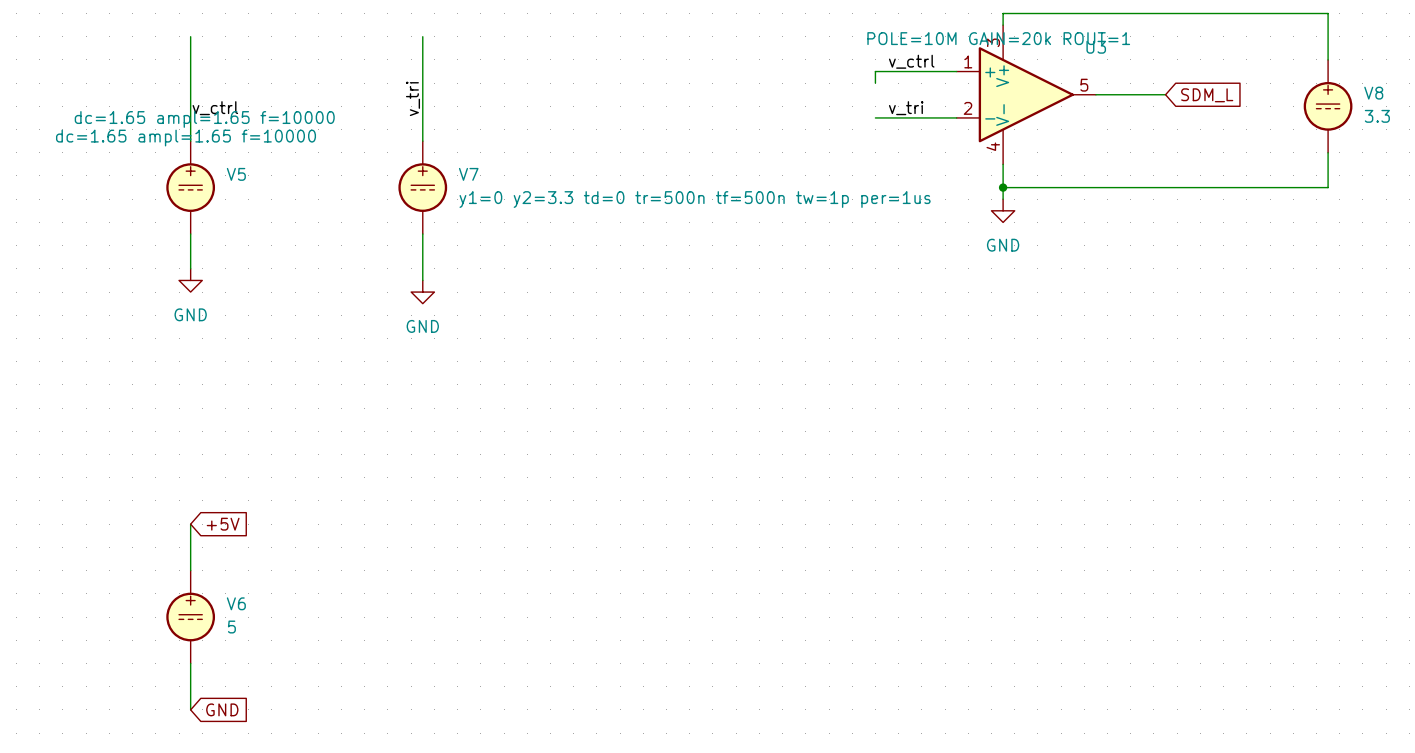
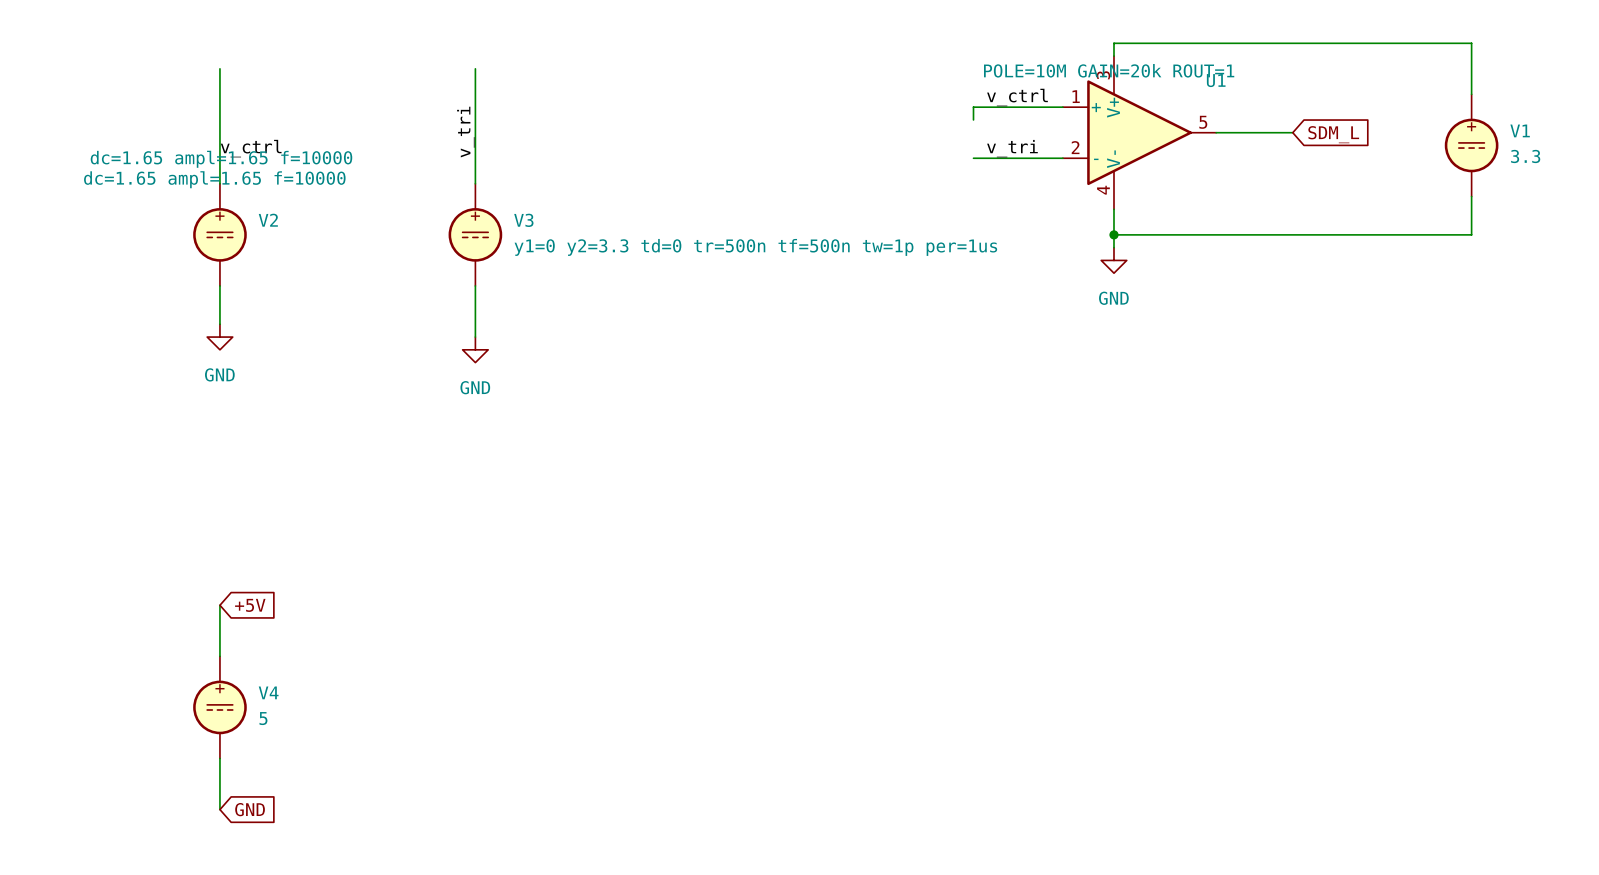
U3 name: U3 (1096, 47) -> U1 (1216, 80)
V8 name: V8 (1373, 93) -> V1 (1520, 130)
V5 name: V5 (236, 174) -> V2 (268, 220)
V7 name: V7 (468, 174) -> V3 (523, 220)
V6 name: V6 (236, 603) -> V4 (268, 692)

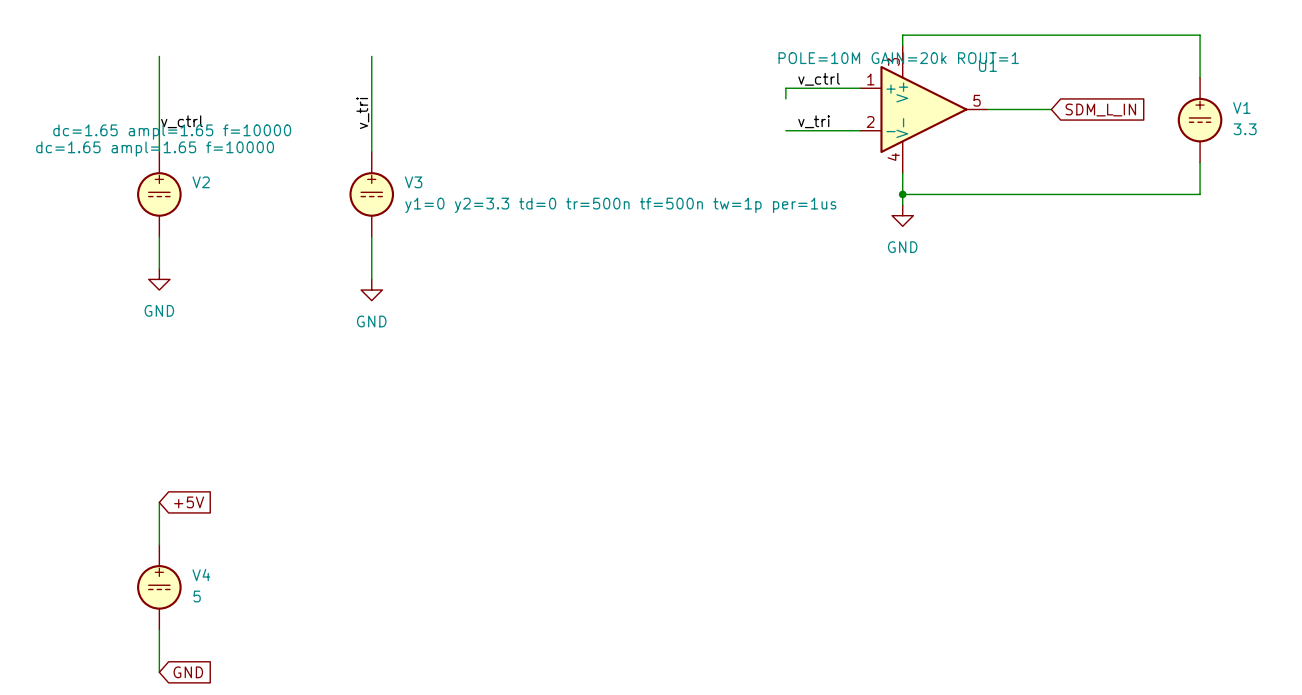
global label: SDM_L (1333, 134) -> SDM_L_IN (1100, 110)

